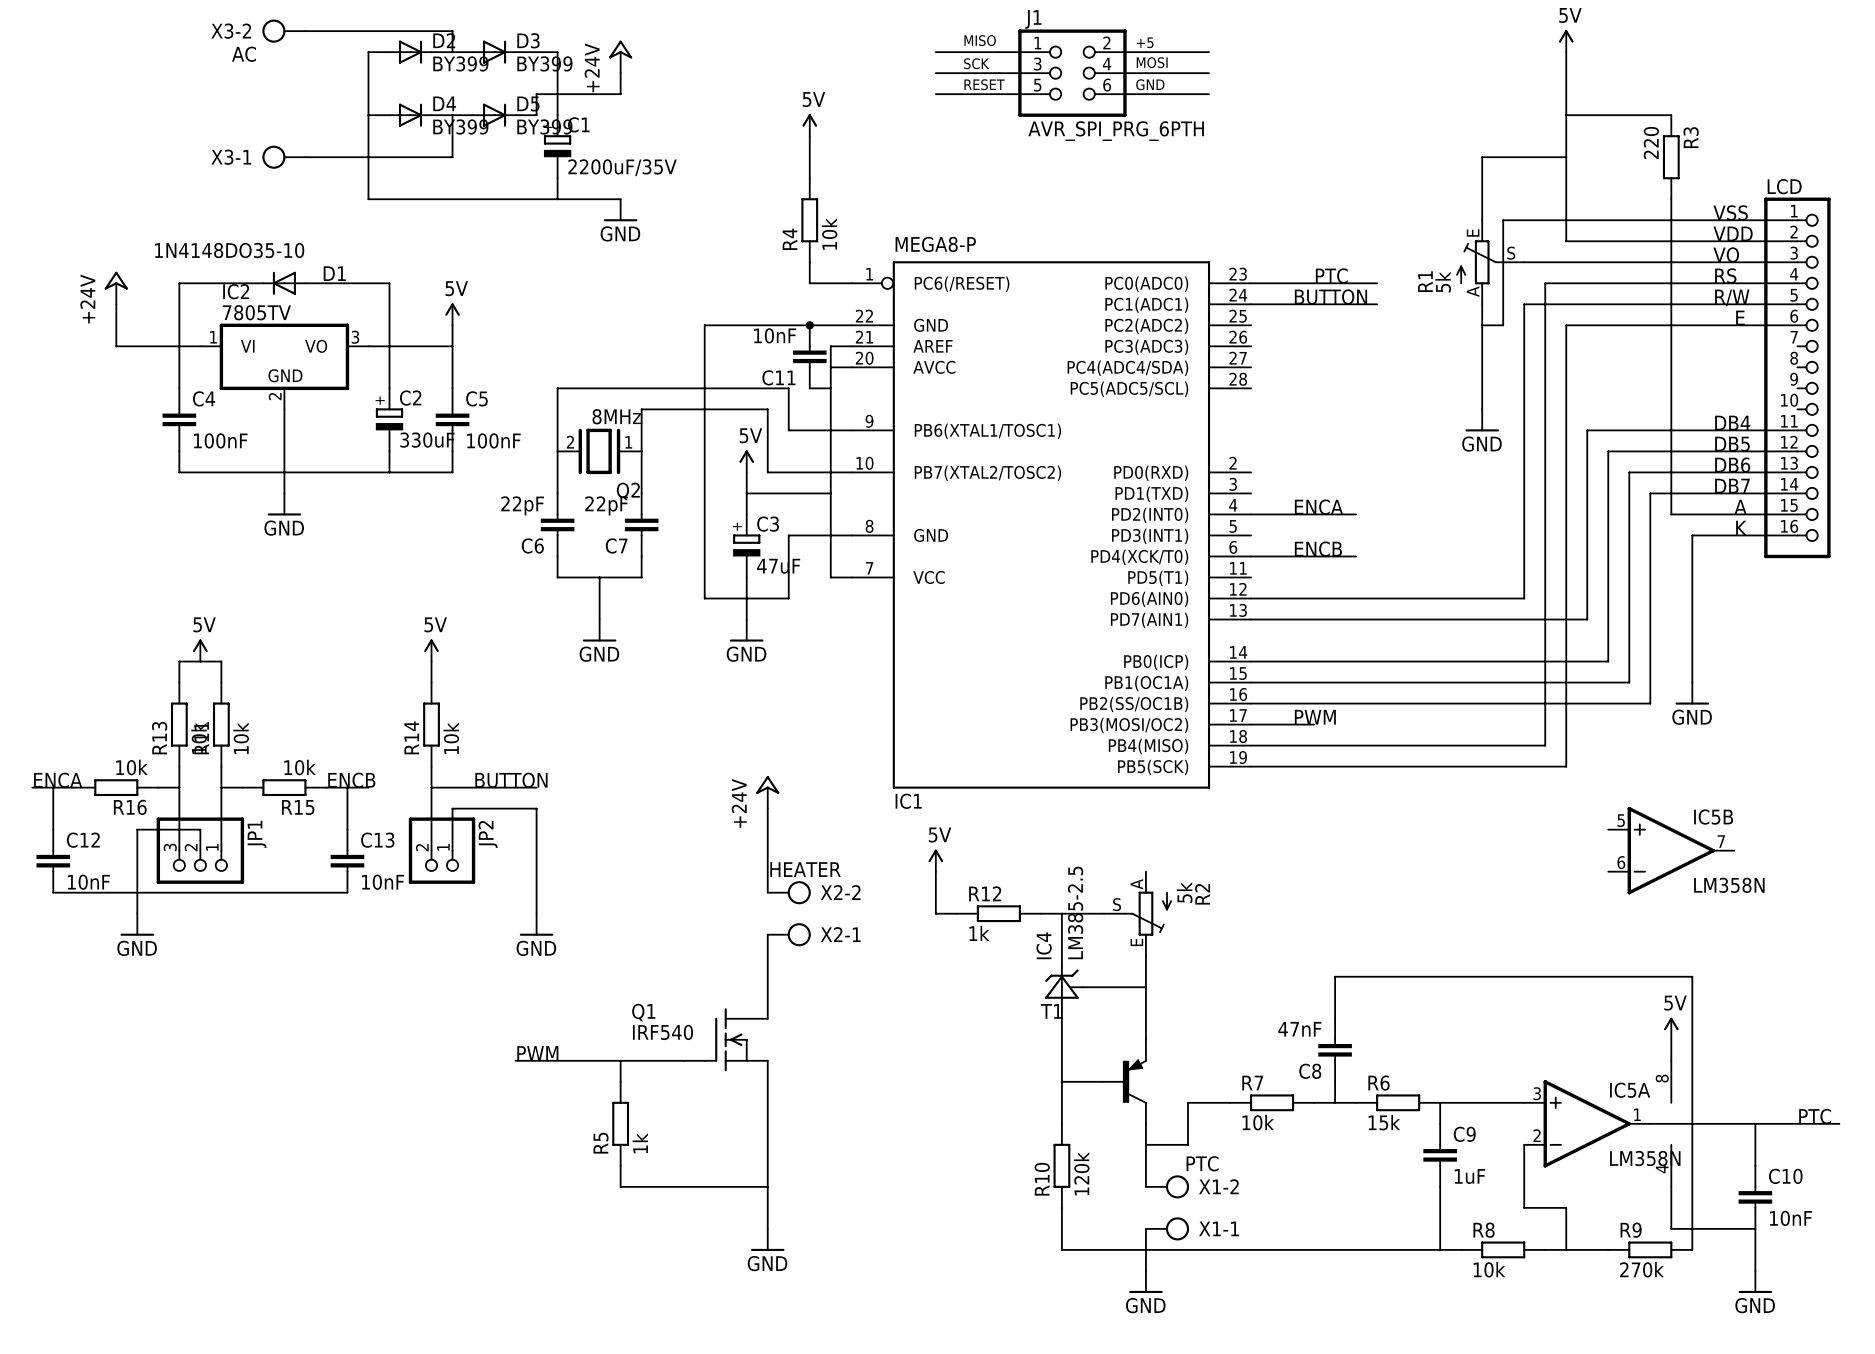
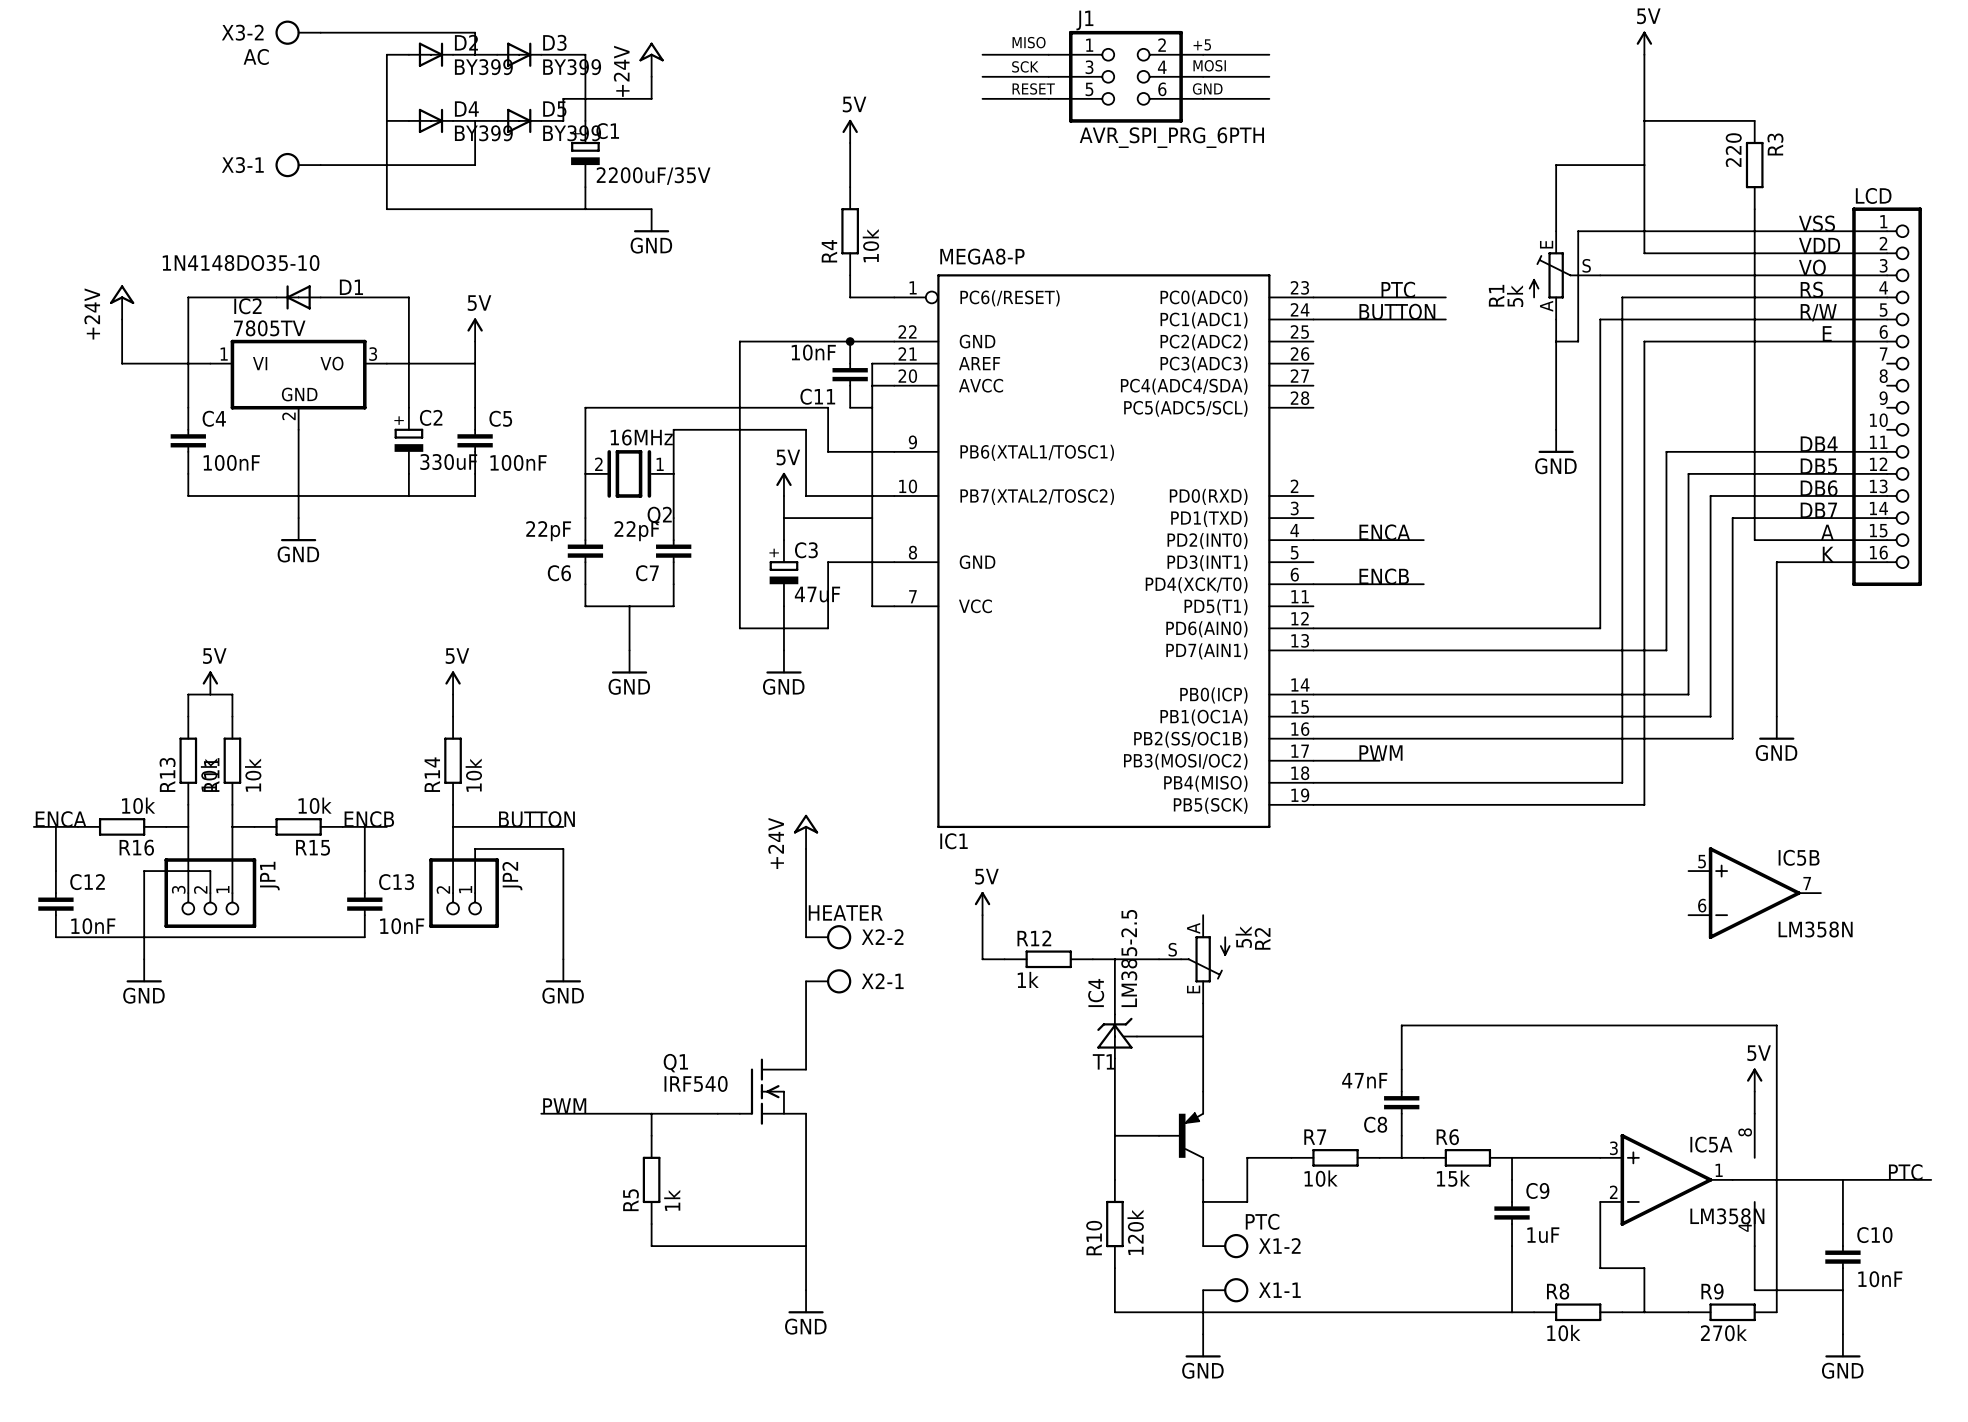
Q2 value: 8MHz (616, 416) -> 16MHz (641, 437)

